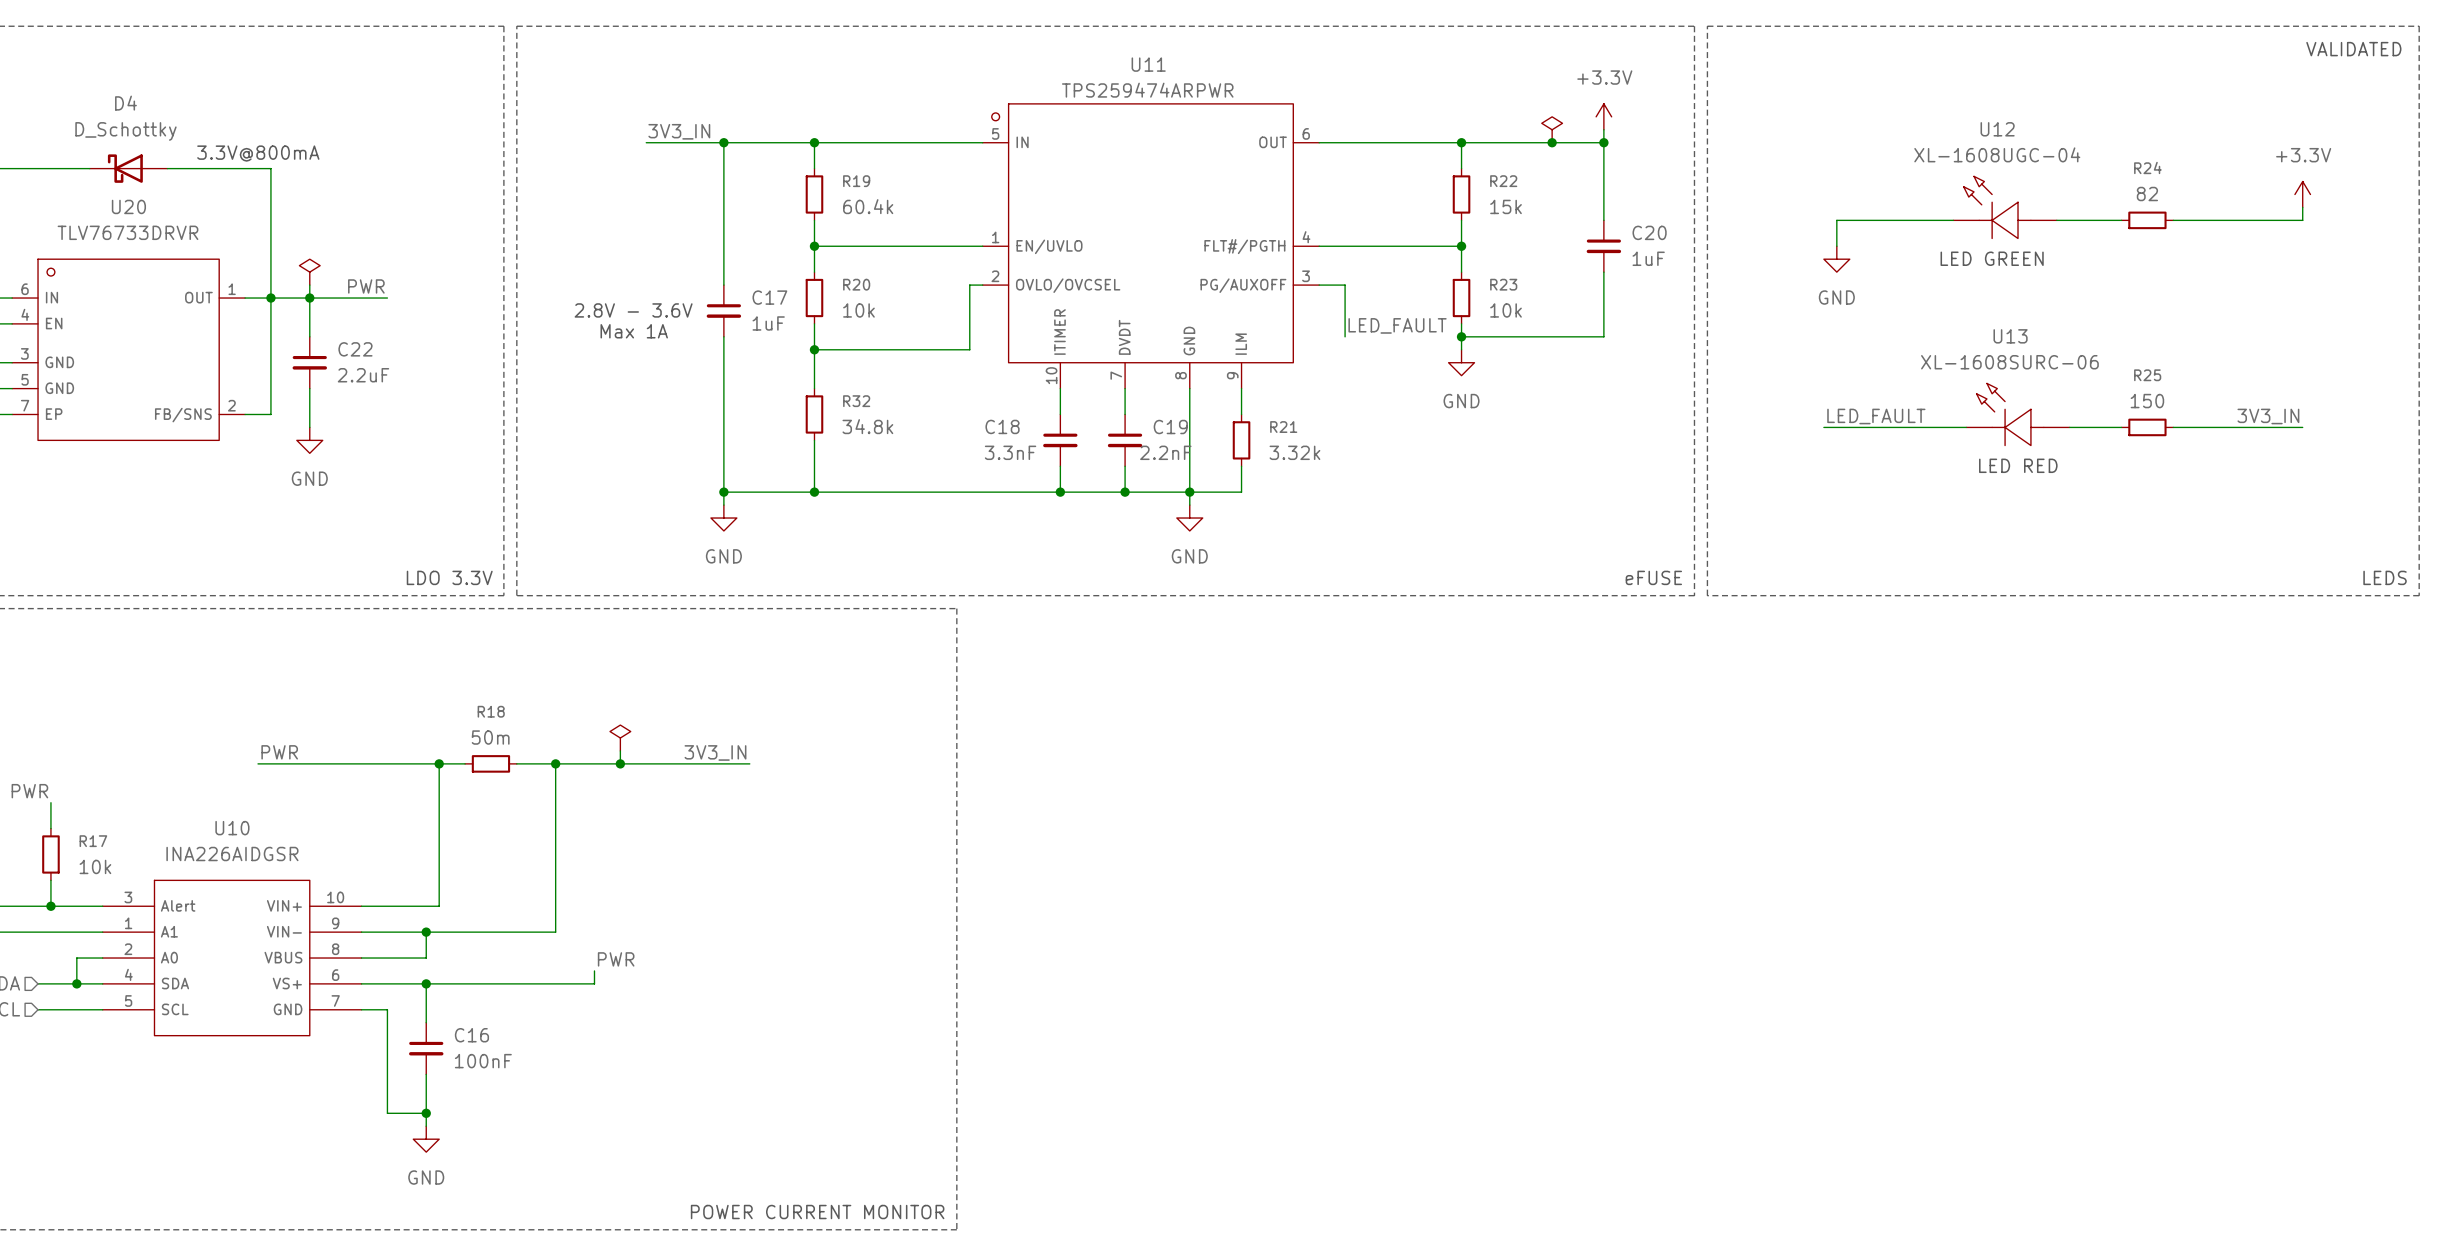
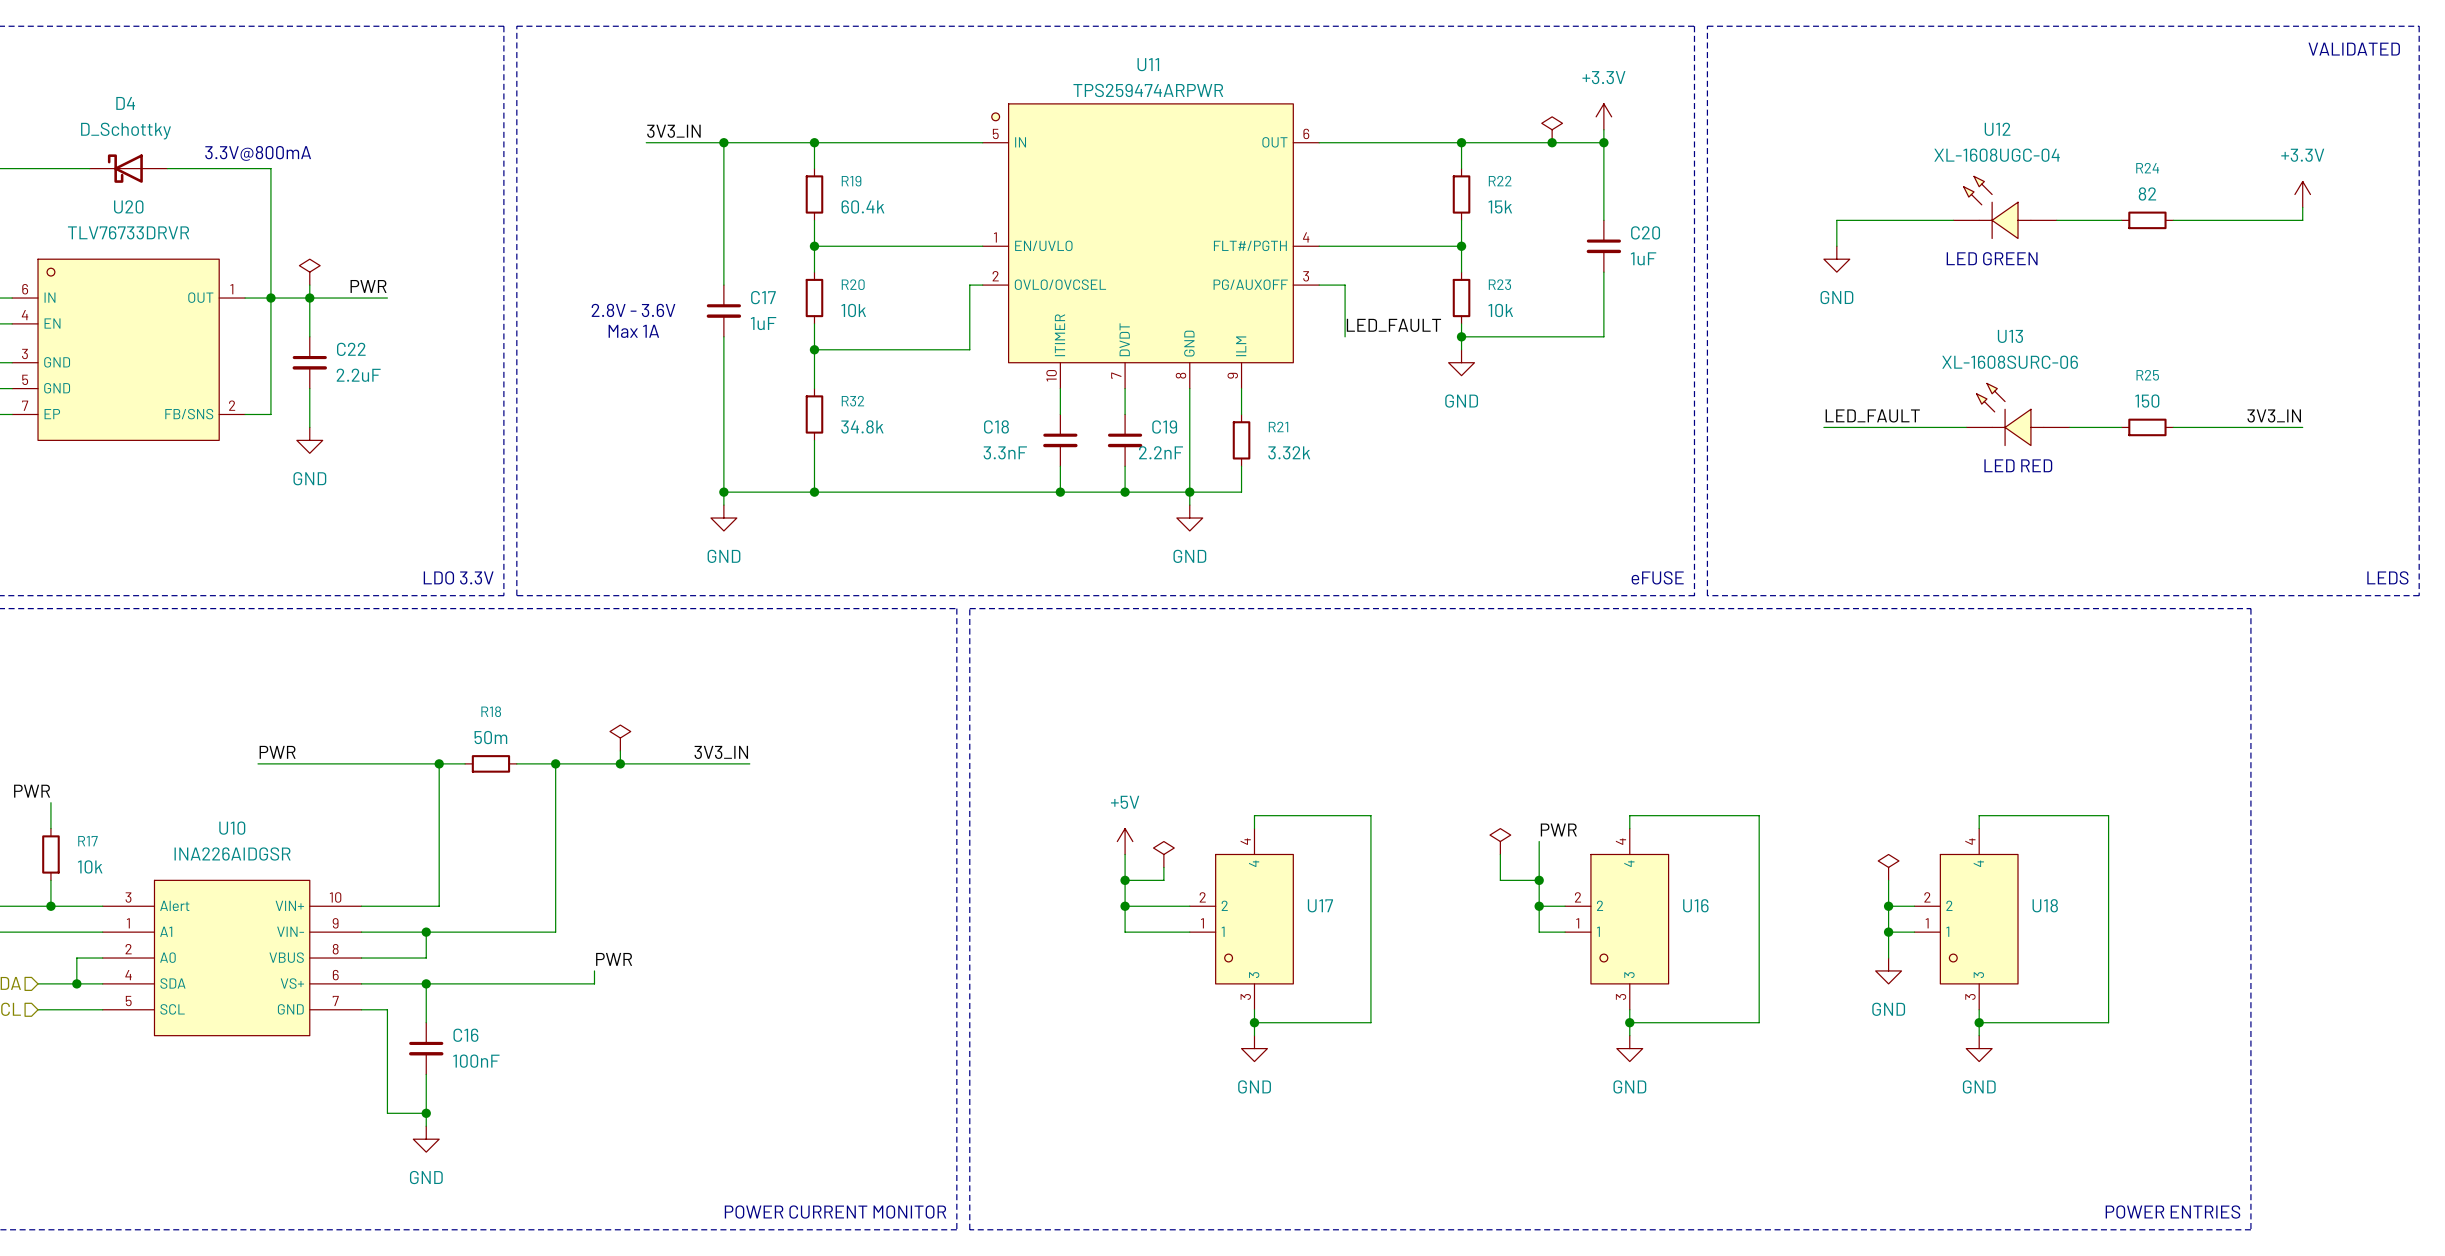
line: none -> (969, 608) (2250, 608) (2250, 1229) (969, 1229) (969, 608)
wire: none -> (1254, 828) (1254, 815) (1370, 815) (1370, 1022) (1254, 1022)
wire: none -> (1629, 828) (1629, 815) (1759, 815) (1759, 1022) (1629, 1022)
wire: none -> (1979, 828) (1979, 815) (2108, 815) (2108, 1022) (1979, 1022)
label: none -> PWR (1558, 829)
power symbol: none -> +5V (1125, 841)
power symbol: none -> (1500, 841)
wire: none -> (1539, 841) (1539, 932) (1565, 932)
wire: none -> (1125, 854) (1125, 932) (1189, 932)
power symbol: none -> (1163, 854)
wire: none -> (1500, 854) (1500, 880) (1539, 880)
wire: none -> (1163, 867) (1163, 880) (1125, 880)
power symbol: none -> (1888, 867)
junction: none -> (1125, 880)
junction: none -> (1539, 880)
wire: none -> (1888, 880) (1888, 958)
wire: none -> (1125, 906) (1189, 906)
junction: none -> (1125, 906)
wire: none -> (1539, 906) (1565, 906)
junction: none -> (1539, 906)
wire: none -> (1888, 906) (1914, 906)
junction: none -> (1888, 906)
U17: none -> (1241, 919)
U16: none -> (1616, 919)
U18: none -> (1966, 919)
wire: none -> (1888, 932) (1914, 932)
junction: none -> (1888, 932)
power symbol: none -> GND (1888, 970)
wire: none -> (1254, 1009) (1254, 1035)
wire: none -> (1629, 1009) (1629, 1035)
wire: none -> (1979, 1009) (1979, 1035)
junction: none -> (1254, 1022)
junction: none -> (1629, 1022)
junction: none -> (1979, 1022)
power symbol: none -> GND (1254, 1048)
power symbol: none -> GND (1629, 1048)
power symbol: none -> GND (1979, 1048)
text: none -> POWER ENTRIES (2172, 1212)

